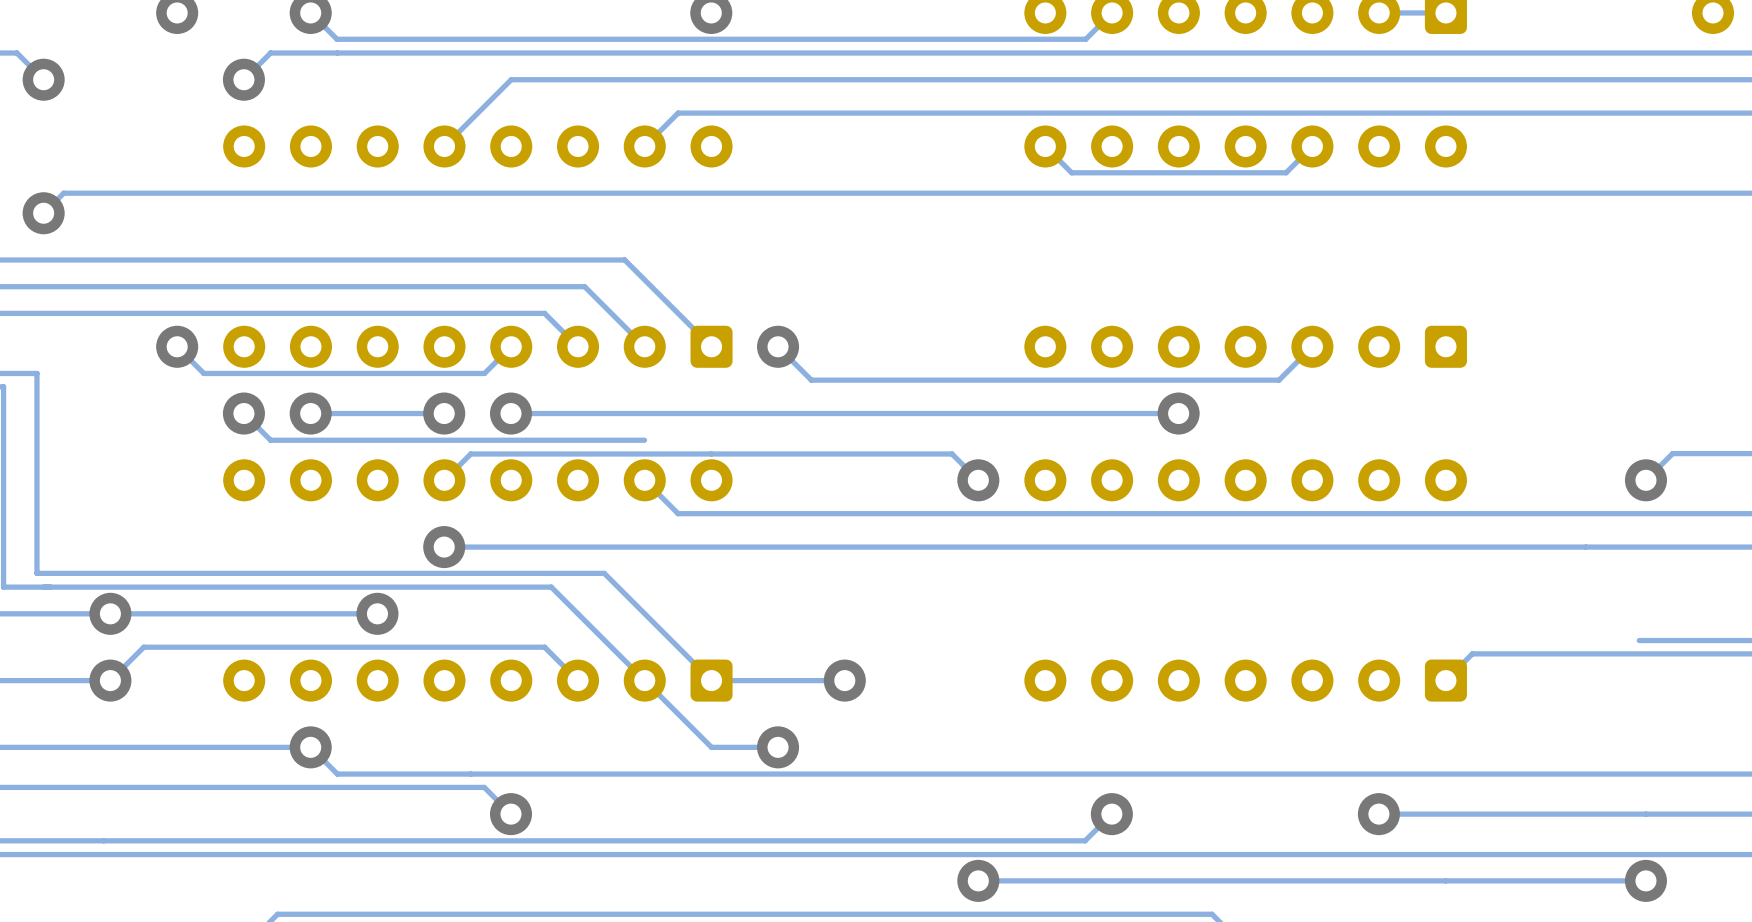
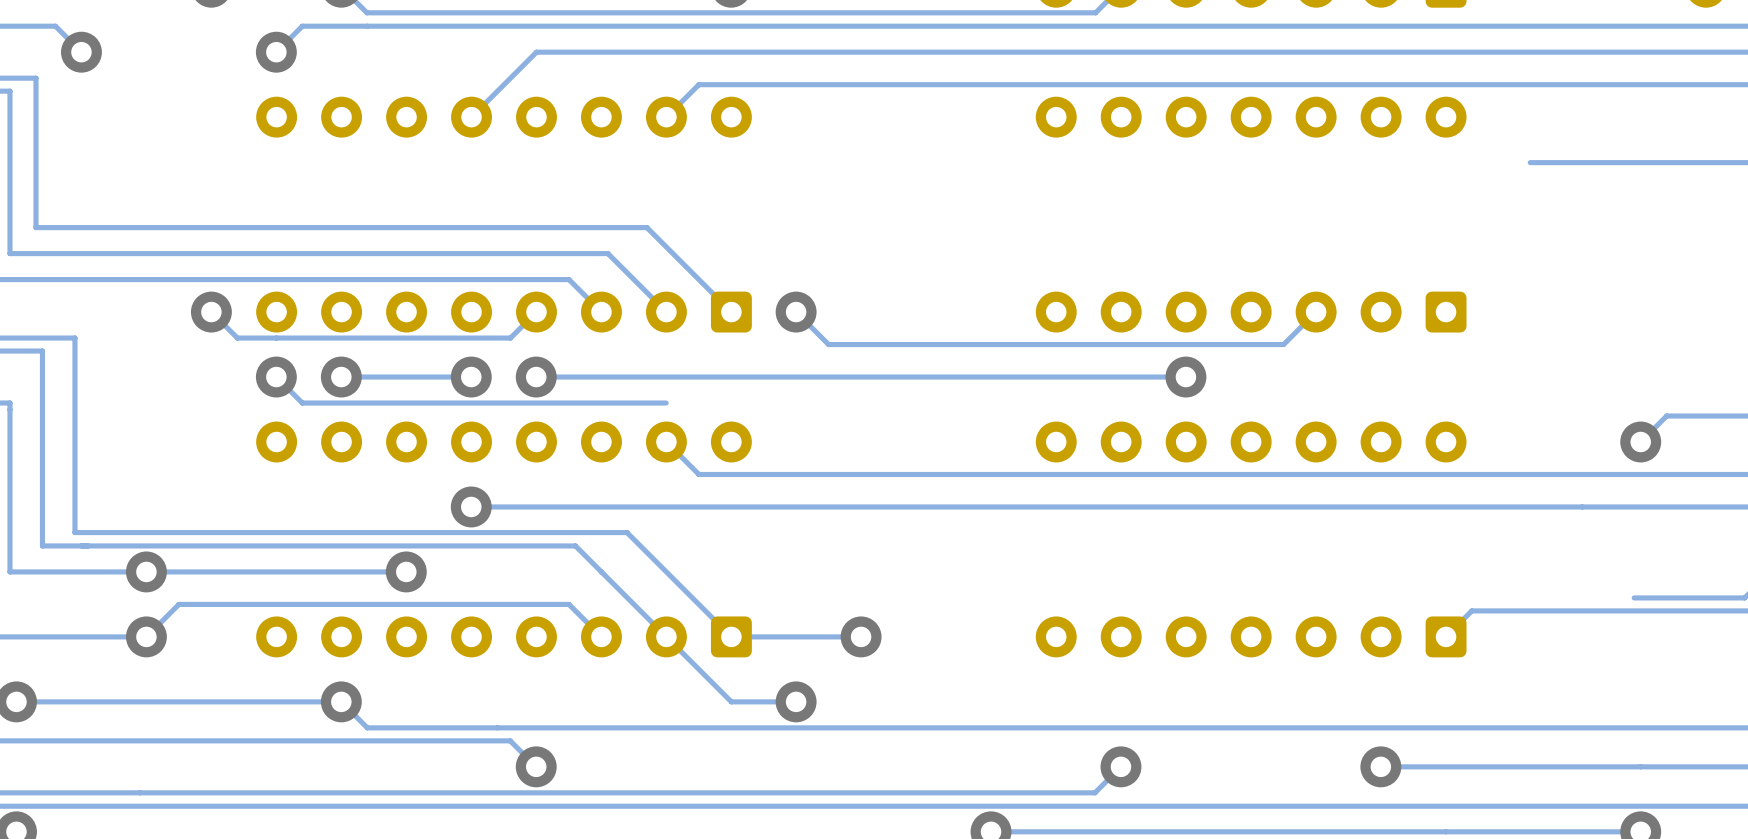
track: (1312, 146) (1286, 172) (1071, 172) (1045, 146) -> none
track: (1532, 193) (63, 193) (43, 213) -> none
via: (43, 213) -> none
track: (978, 480) (952, 453) (470, 453) (444, 480) -> none
via: (978, 480) -> none

